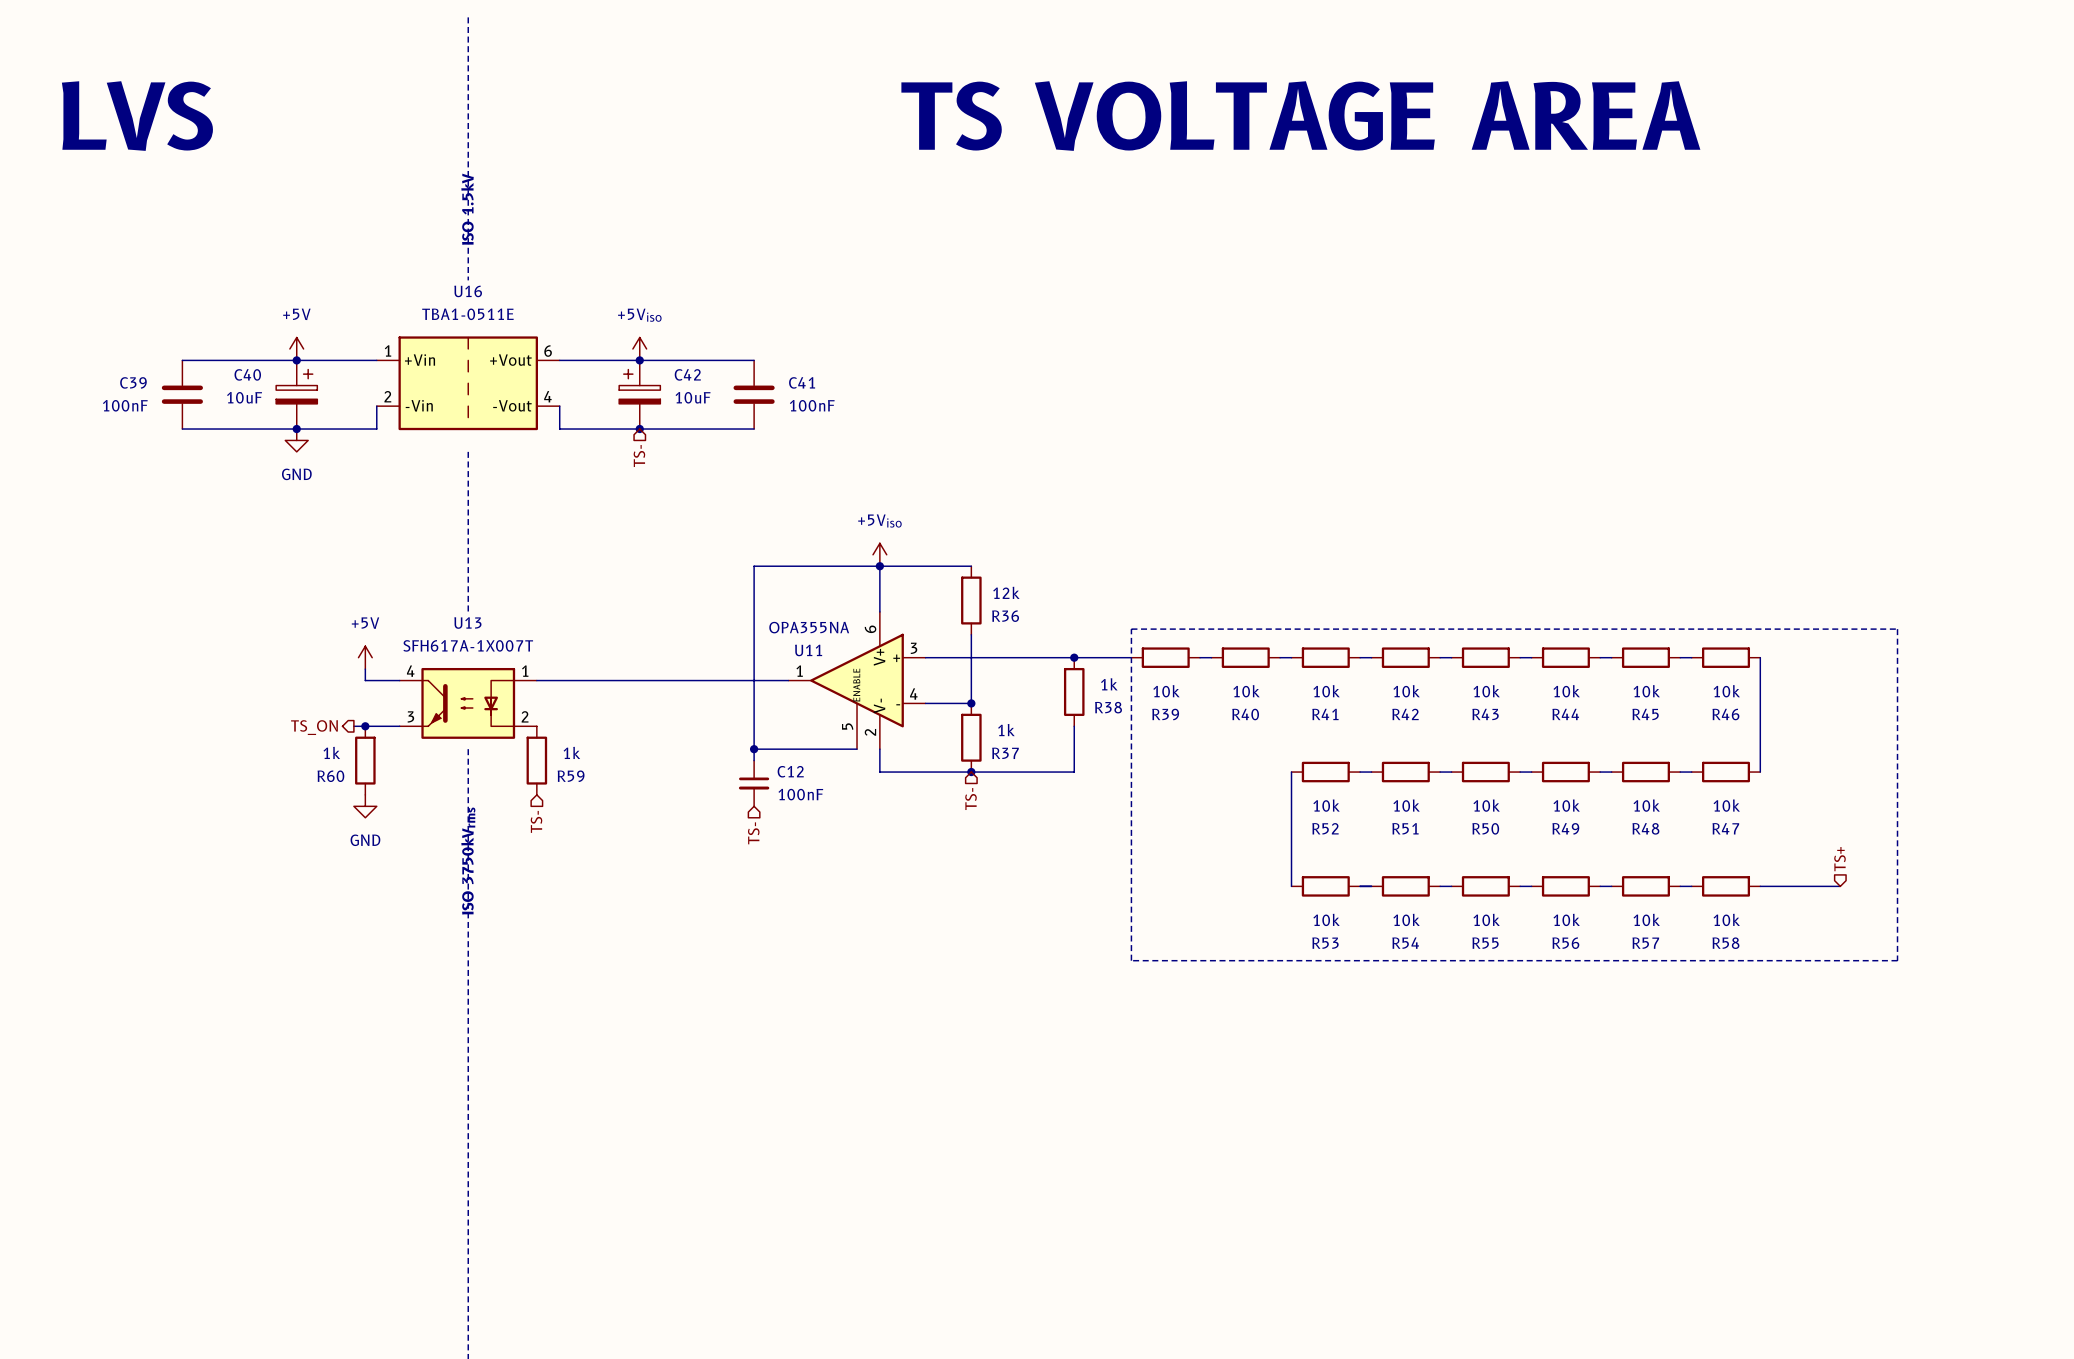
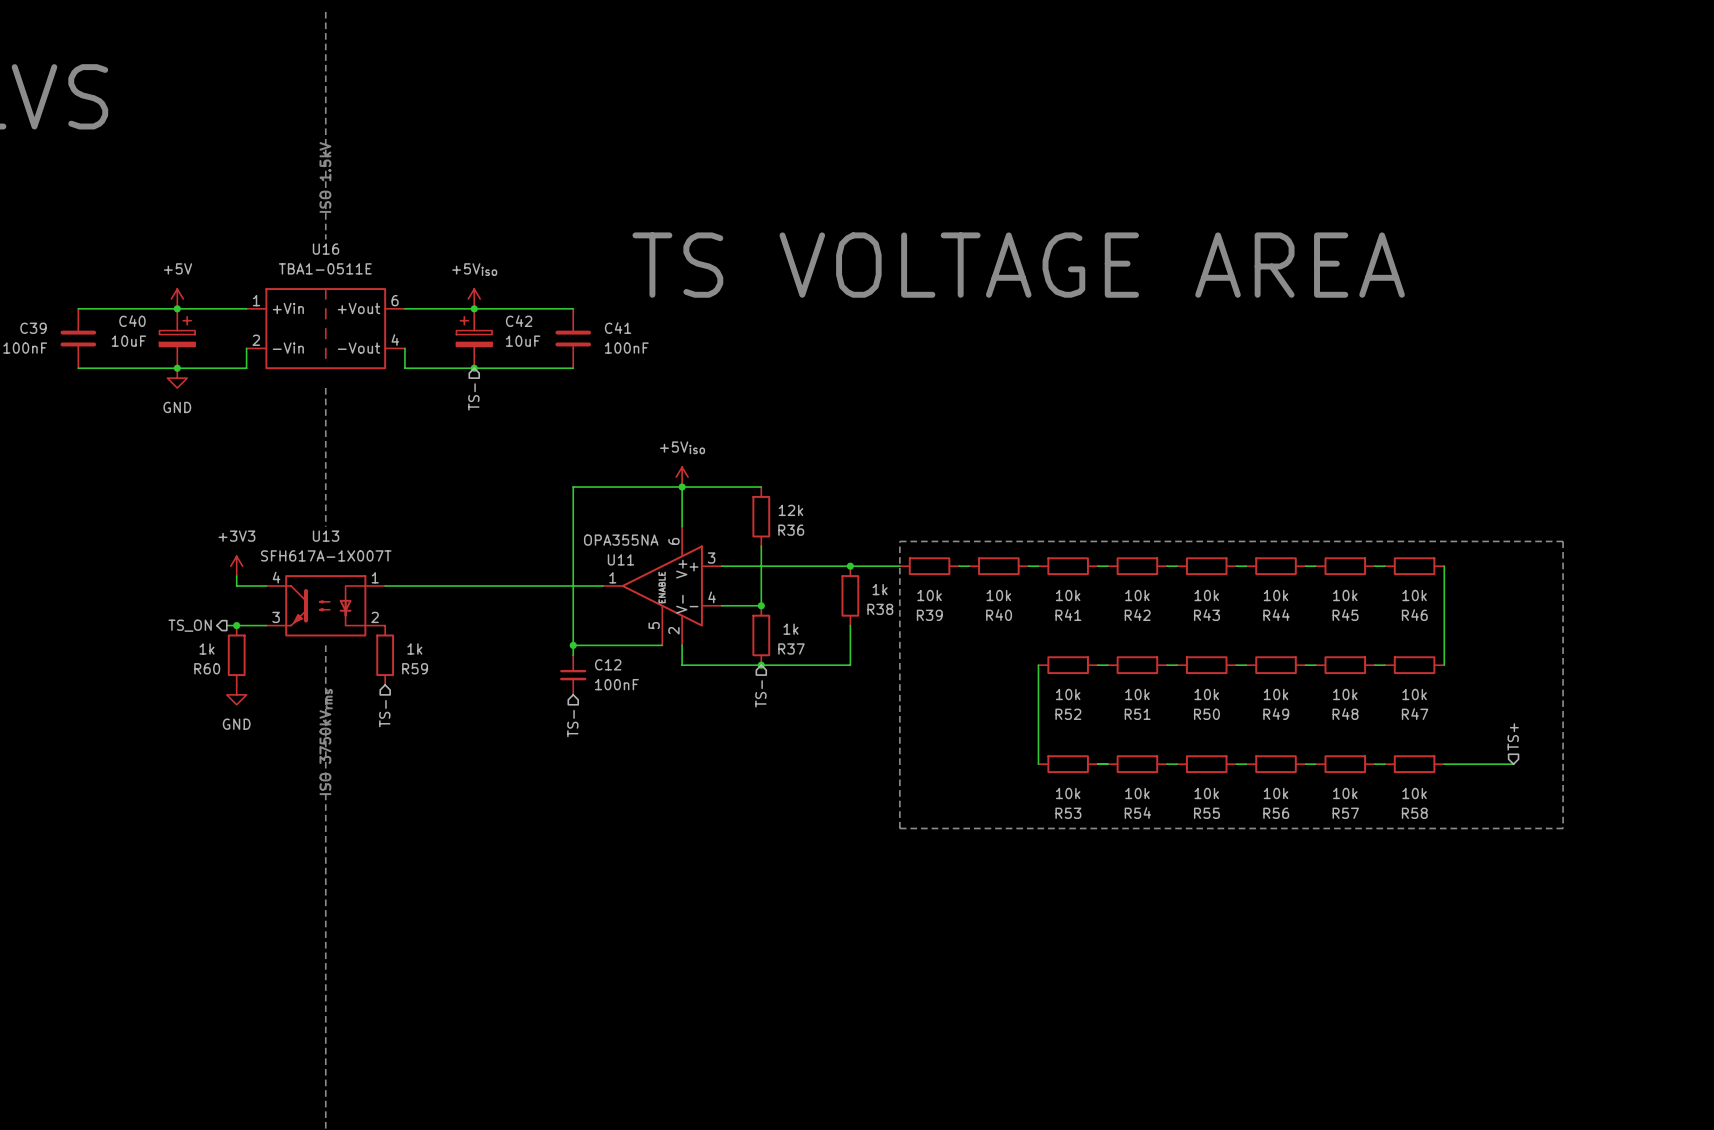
text position: TS VOLTAGE AREA (1300, 116) -> TS VOLTAGE AREA (1018, 265)
power symbol: +5V (365, 657) -> +3V3 (236, 566)

